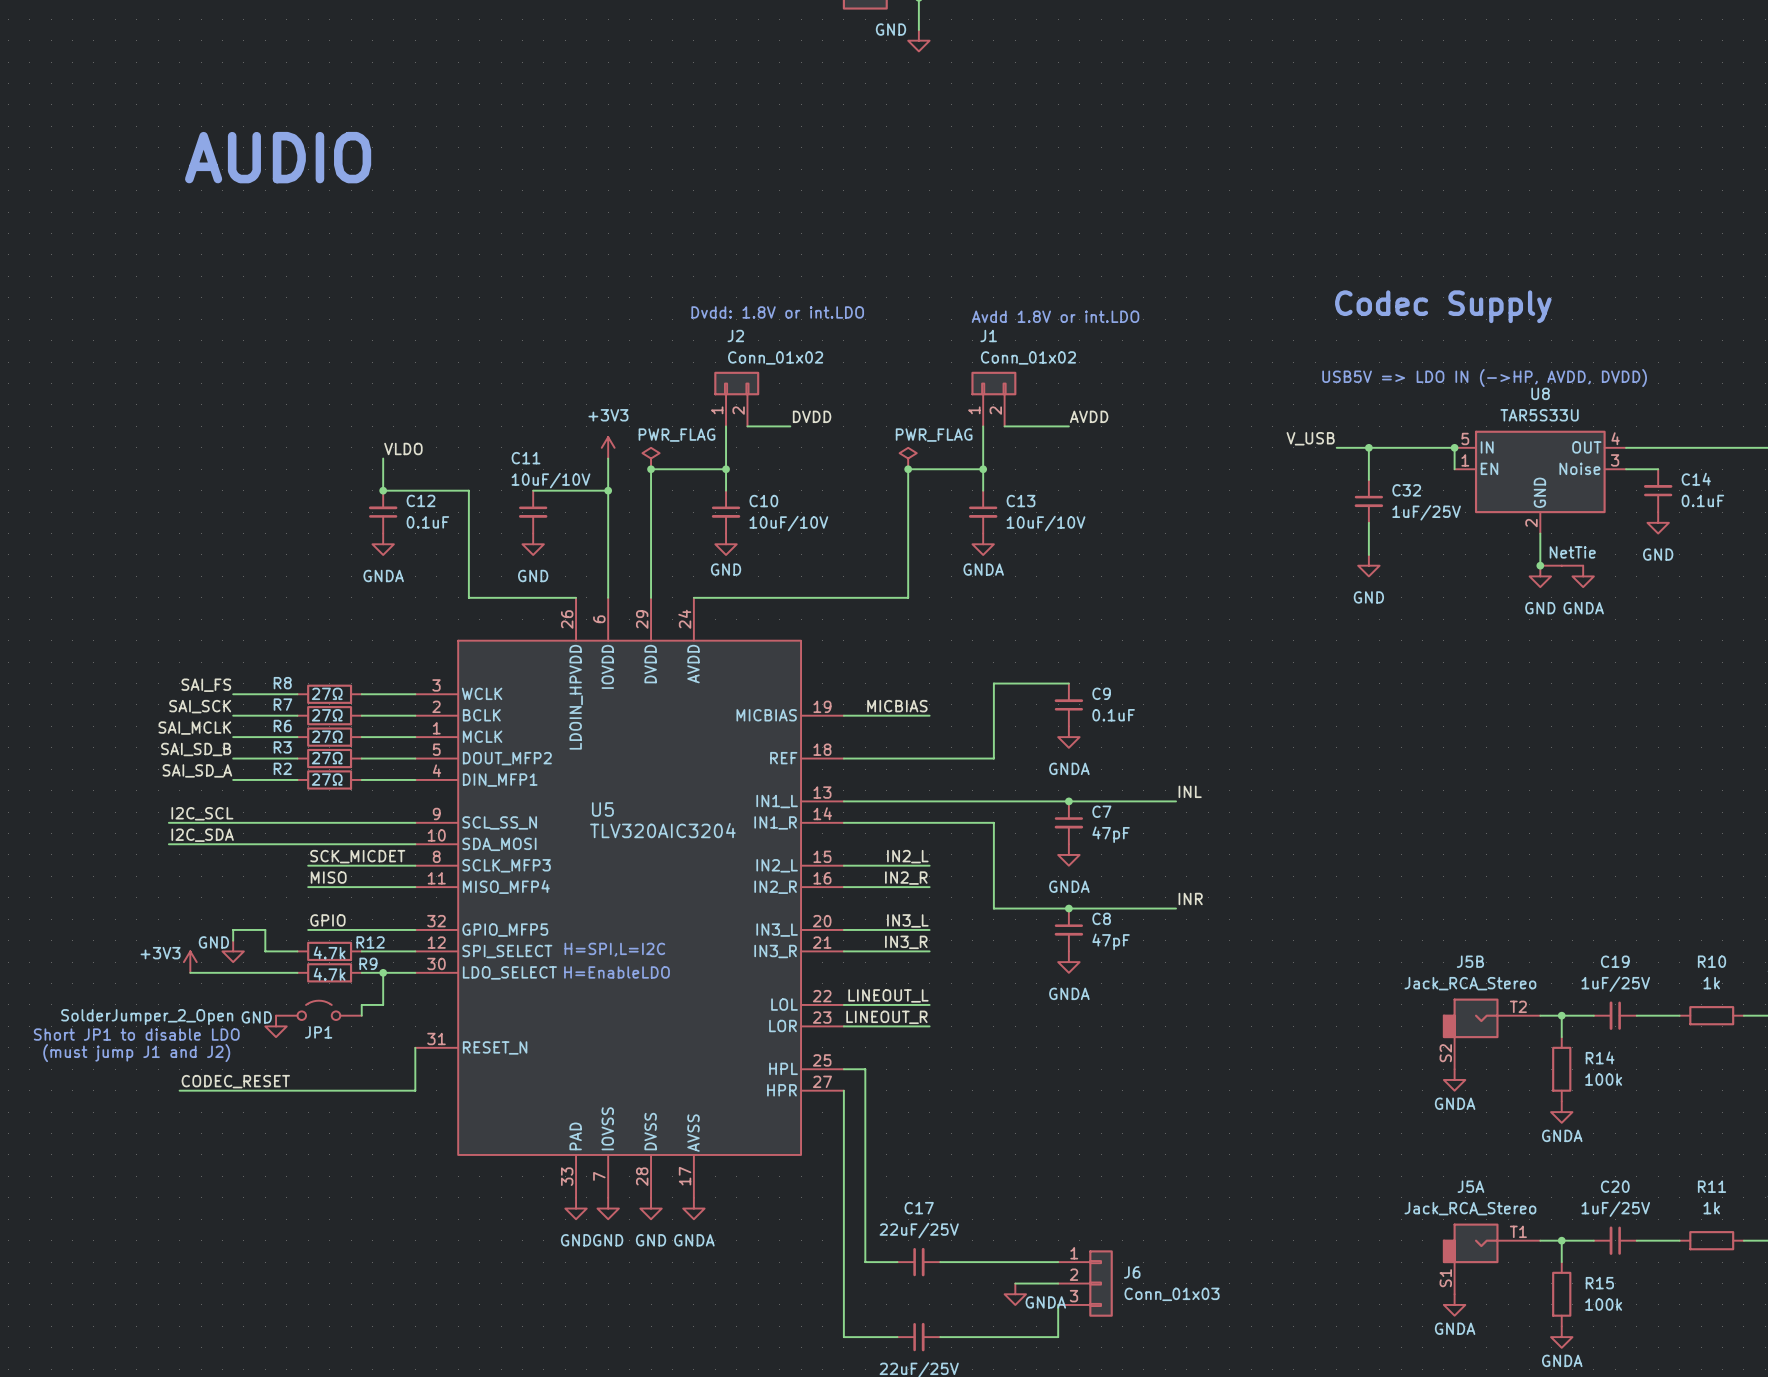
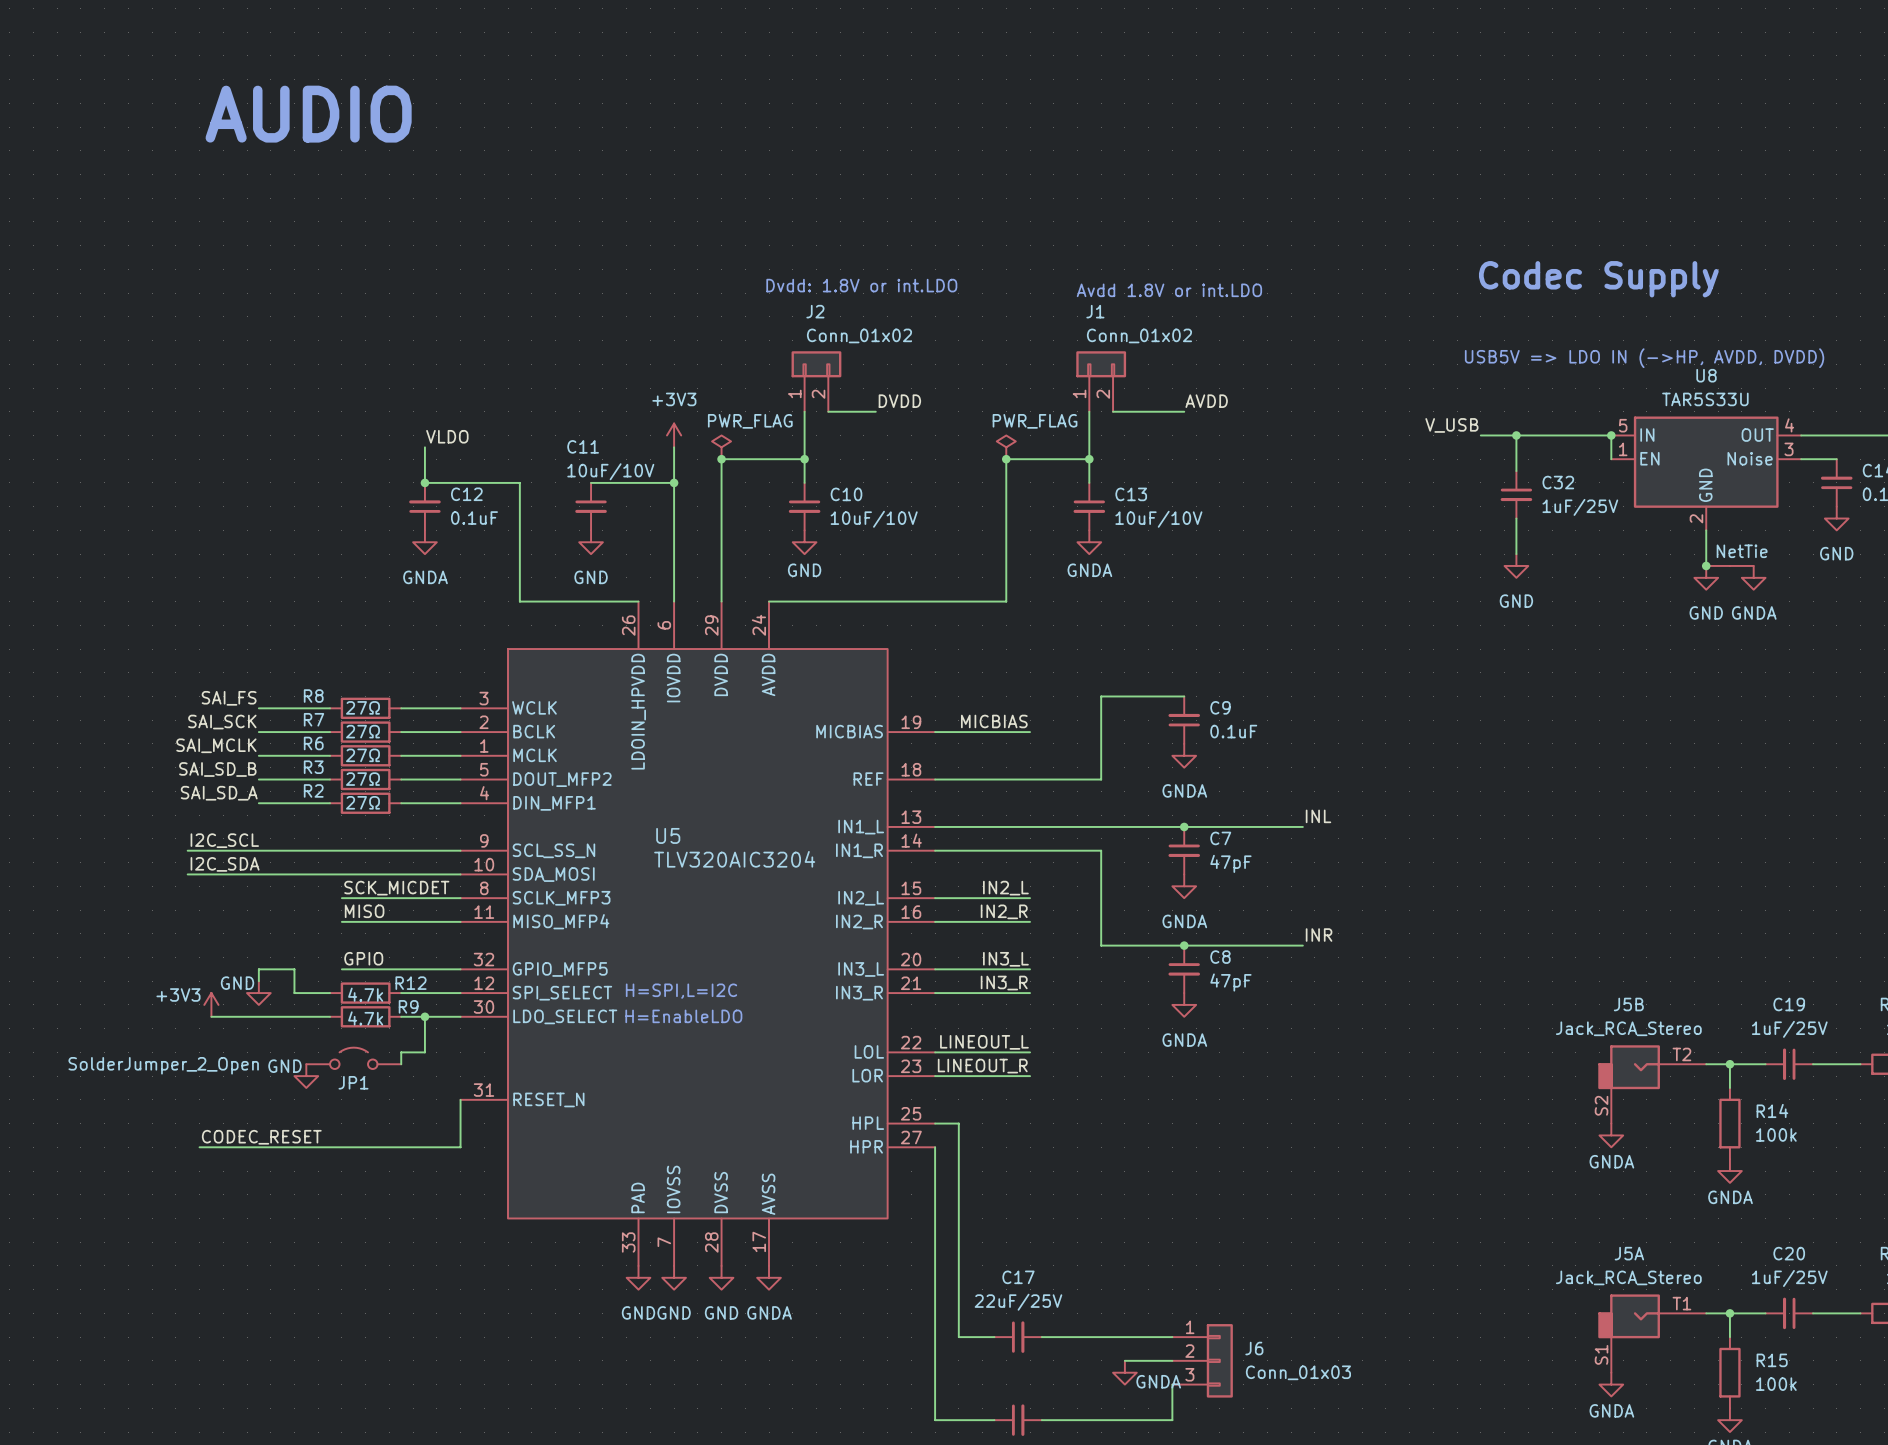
text: Short JP1 to disable LDO (136, 1034) -> none
text: (must jump J1 and J2) (136, 1053) -> none

